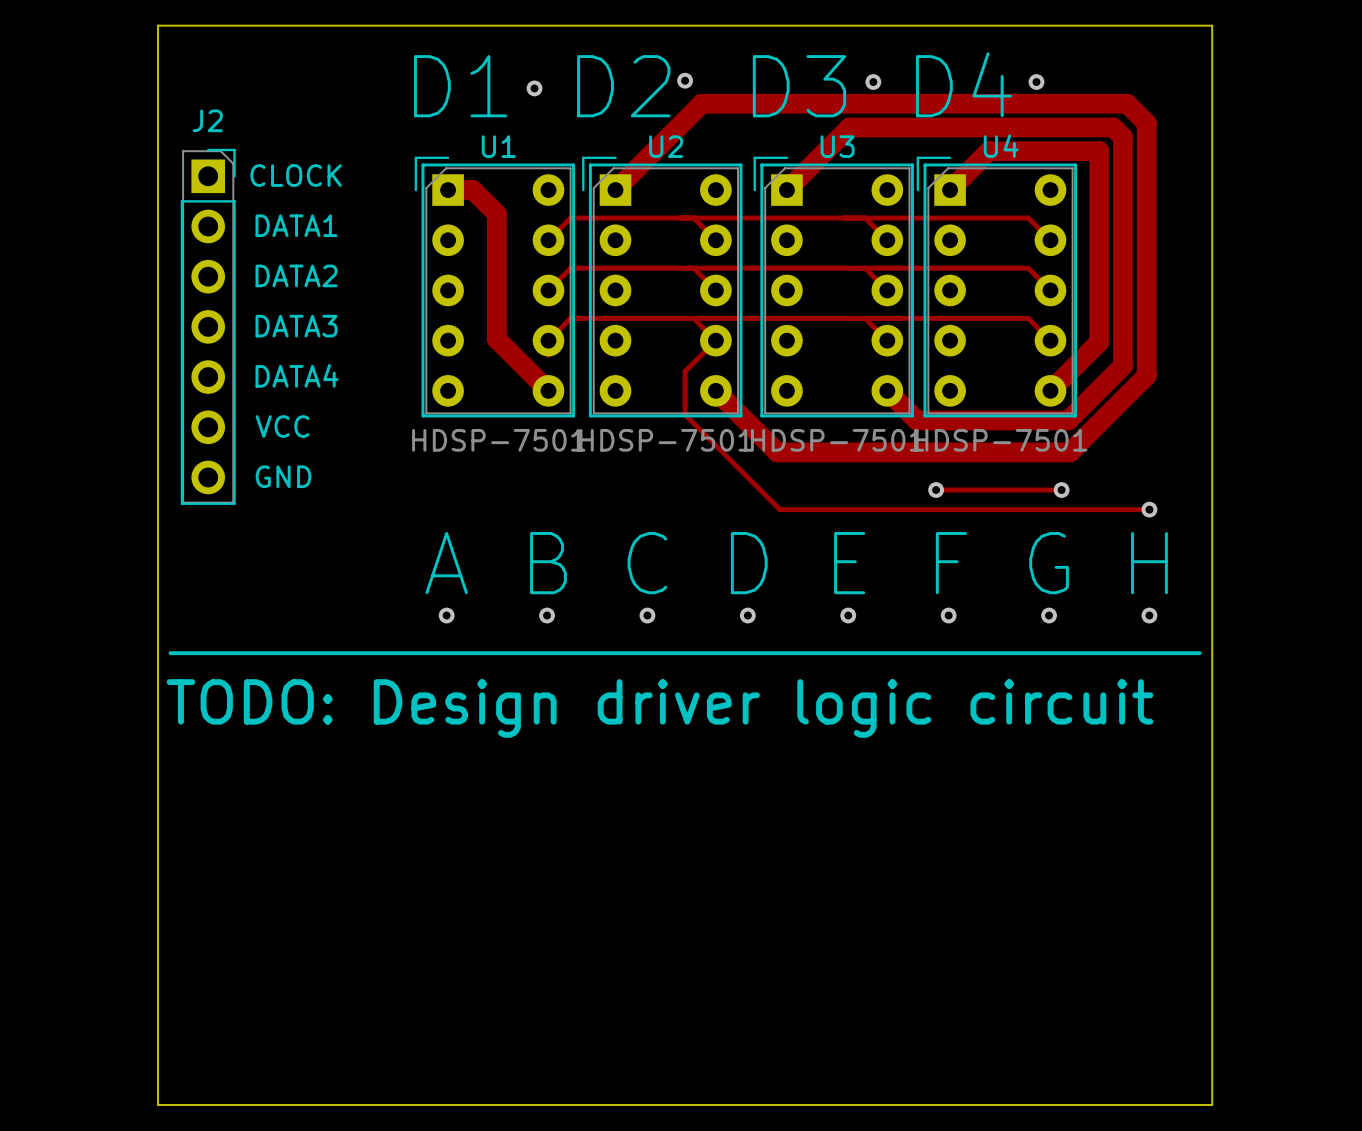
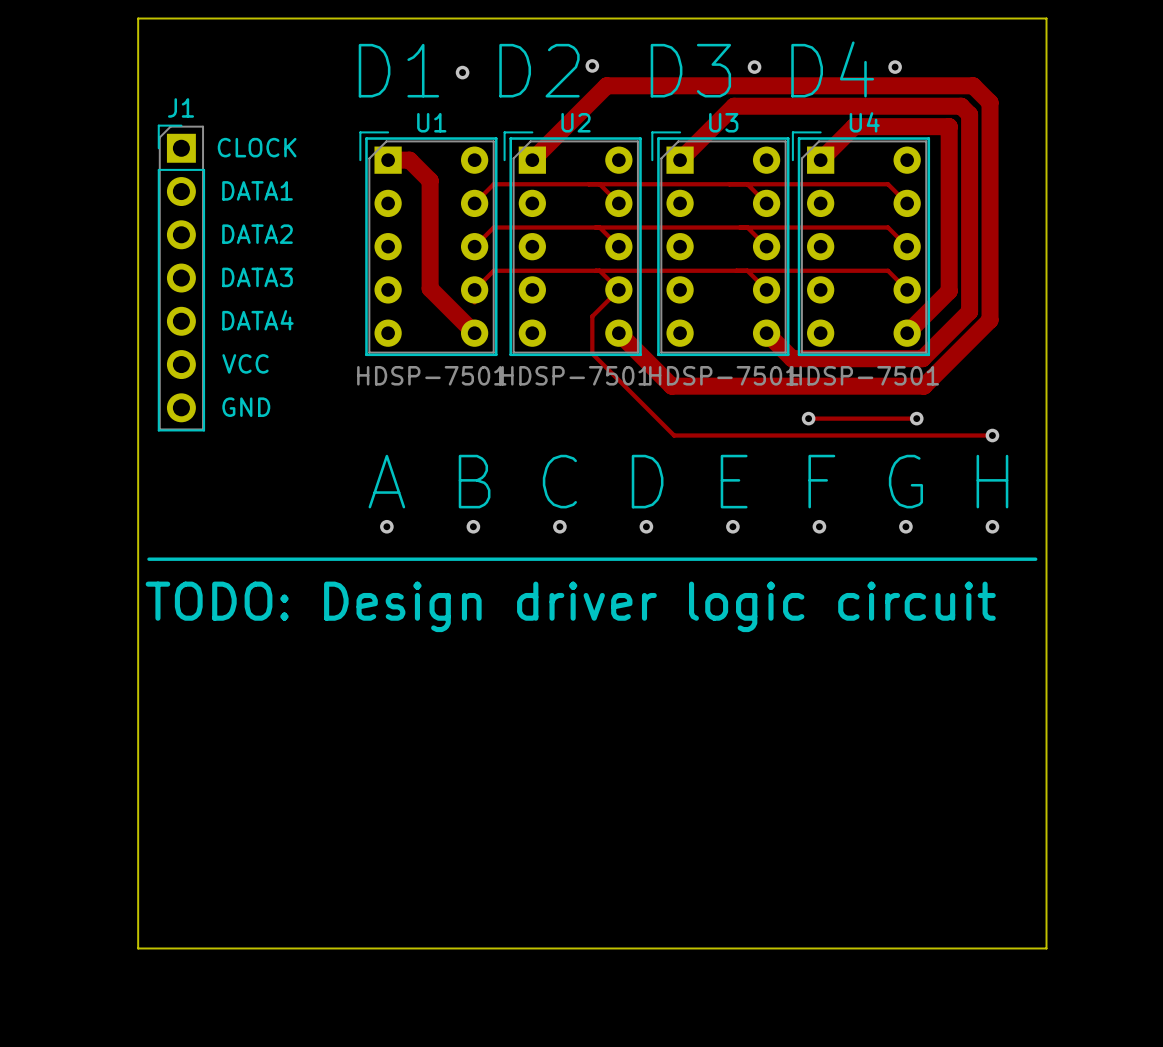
J2: (208, 326) -> none
J1: none -> (181, 278)

